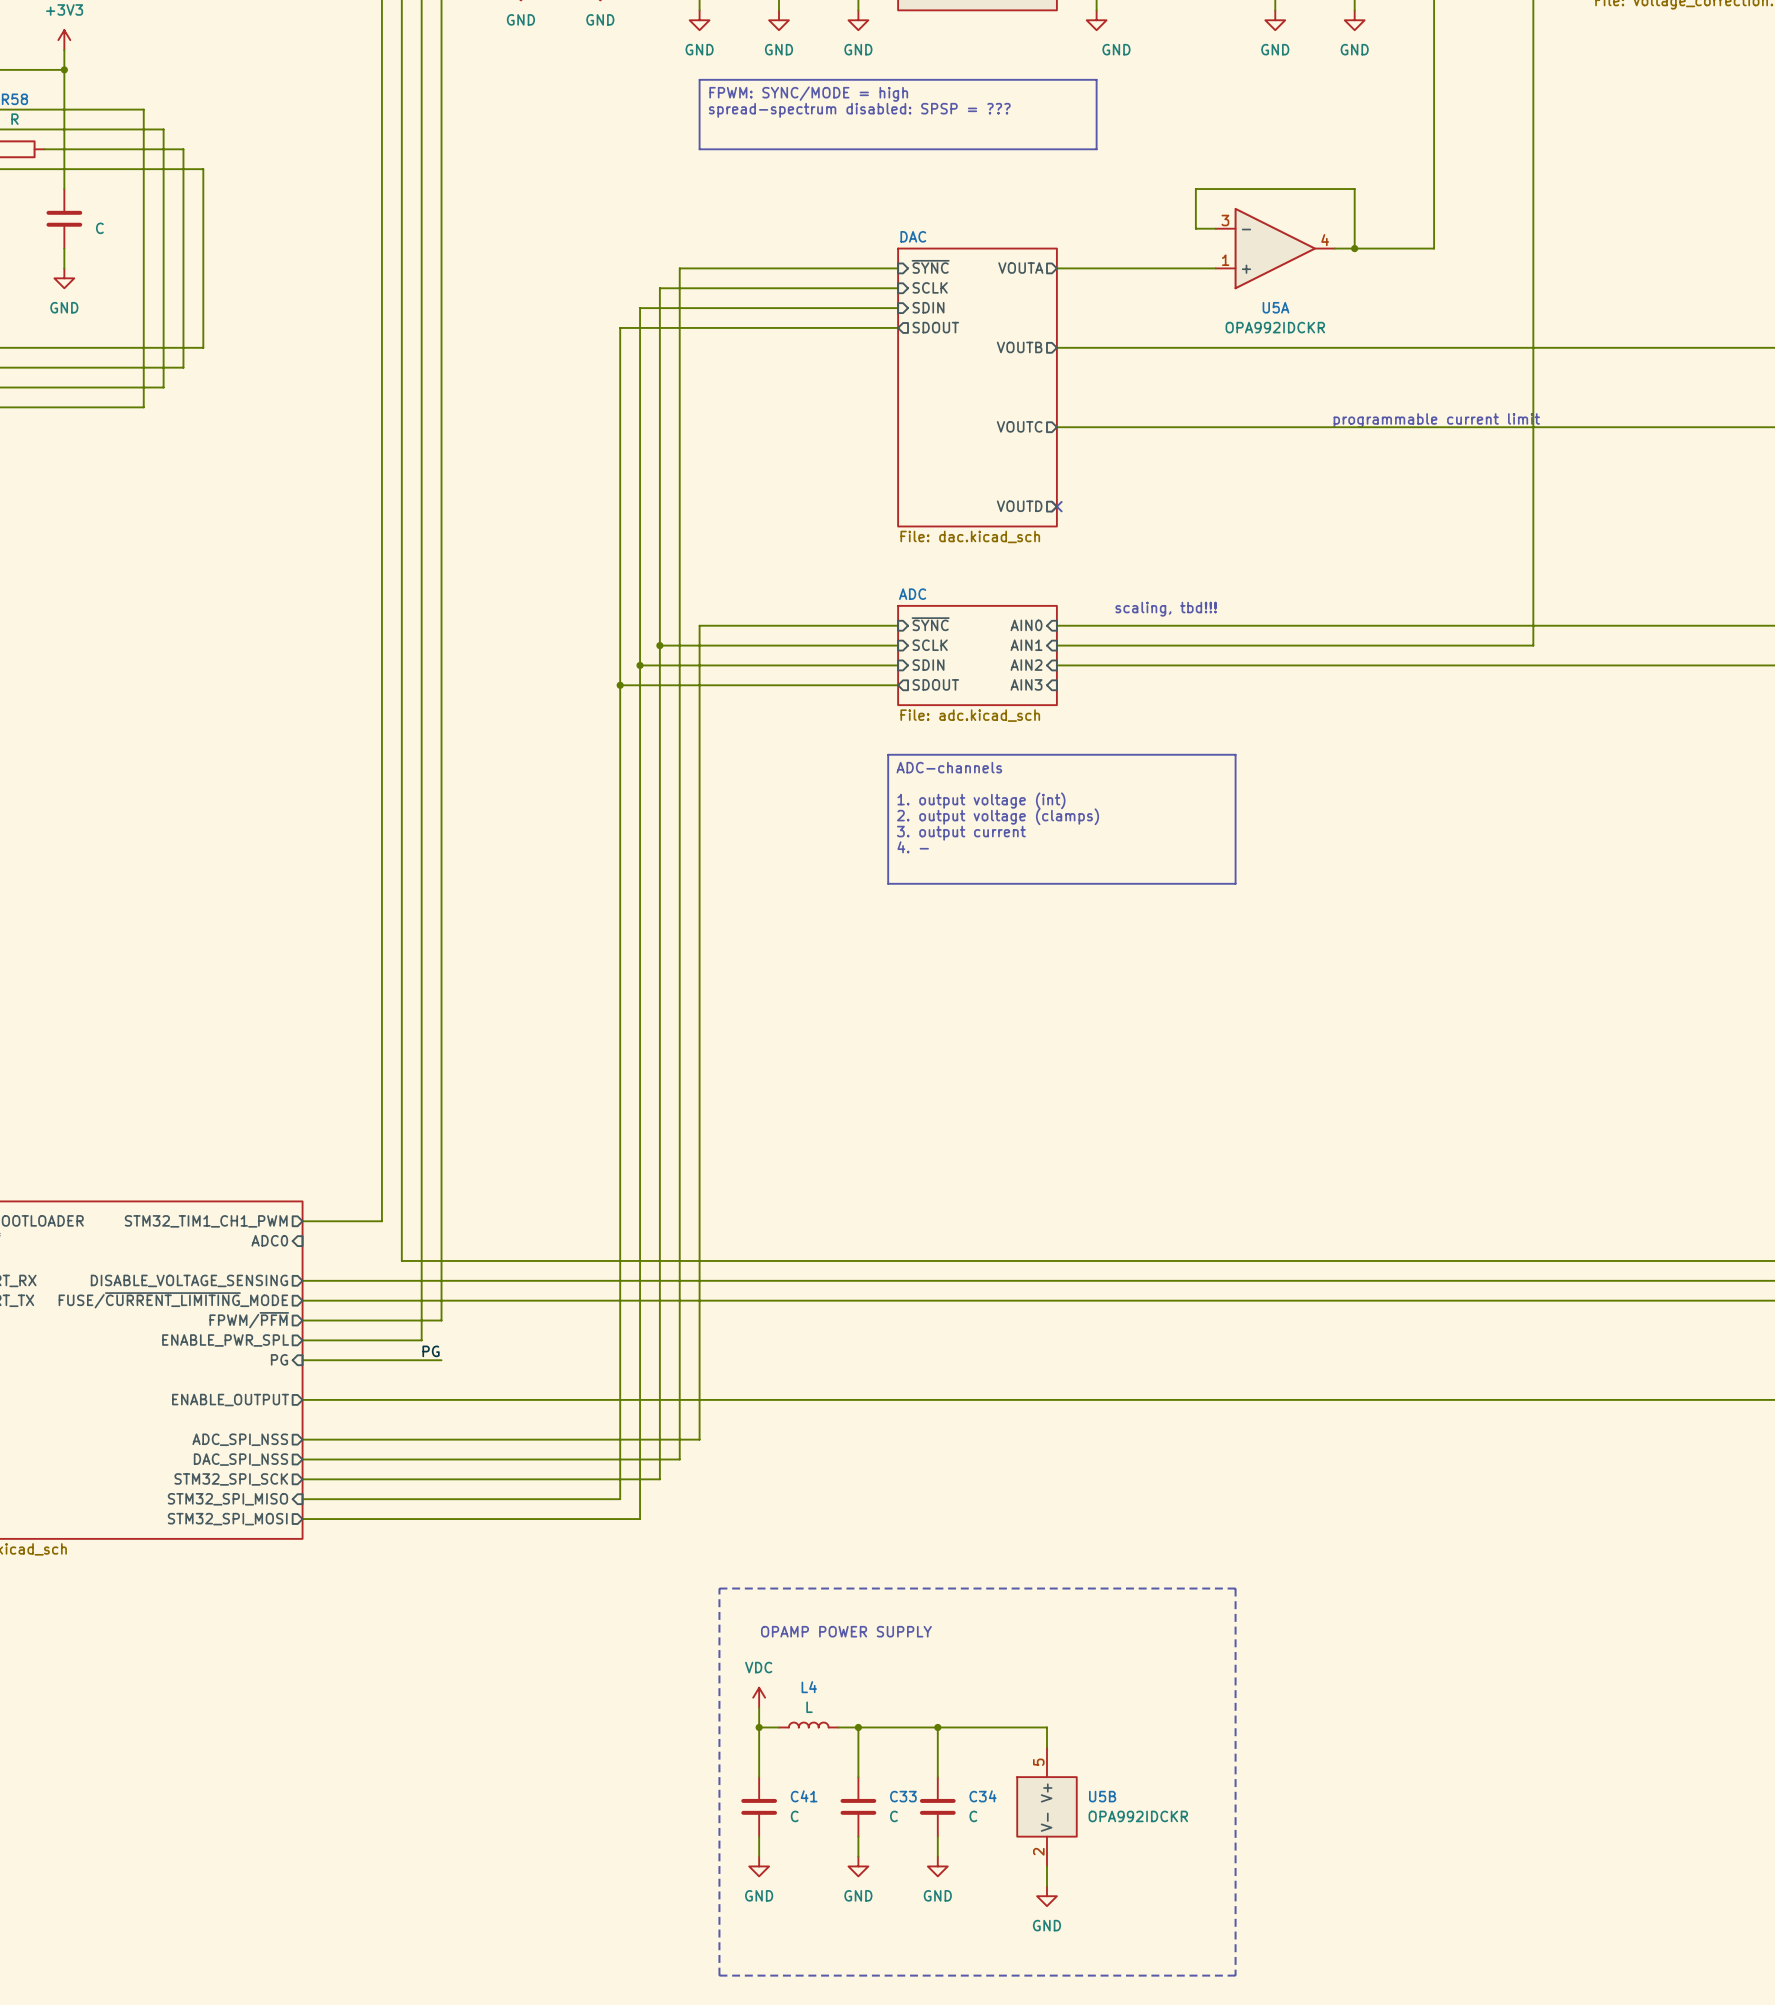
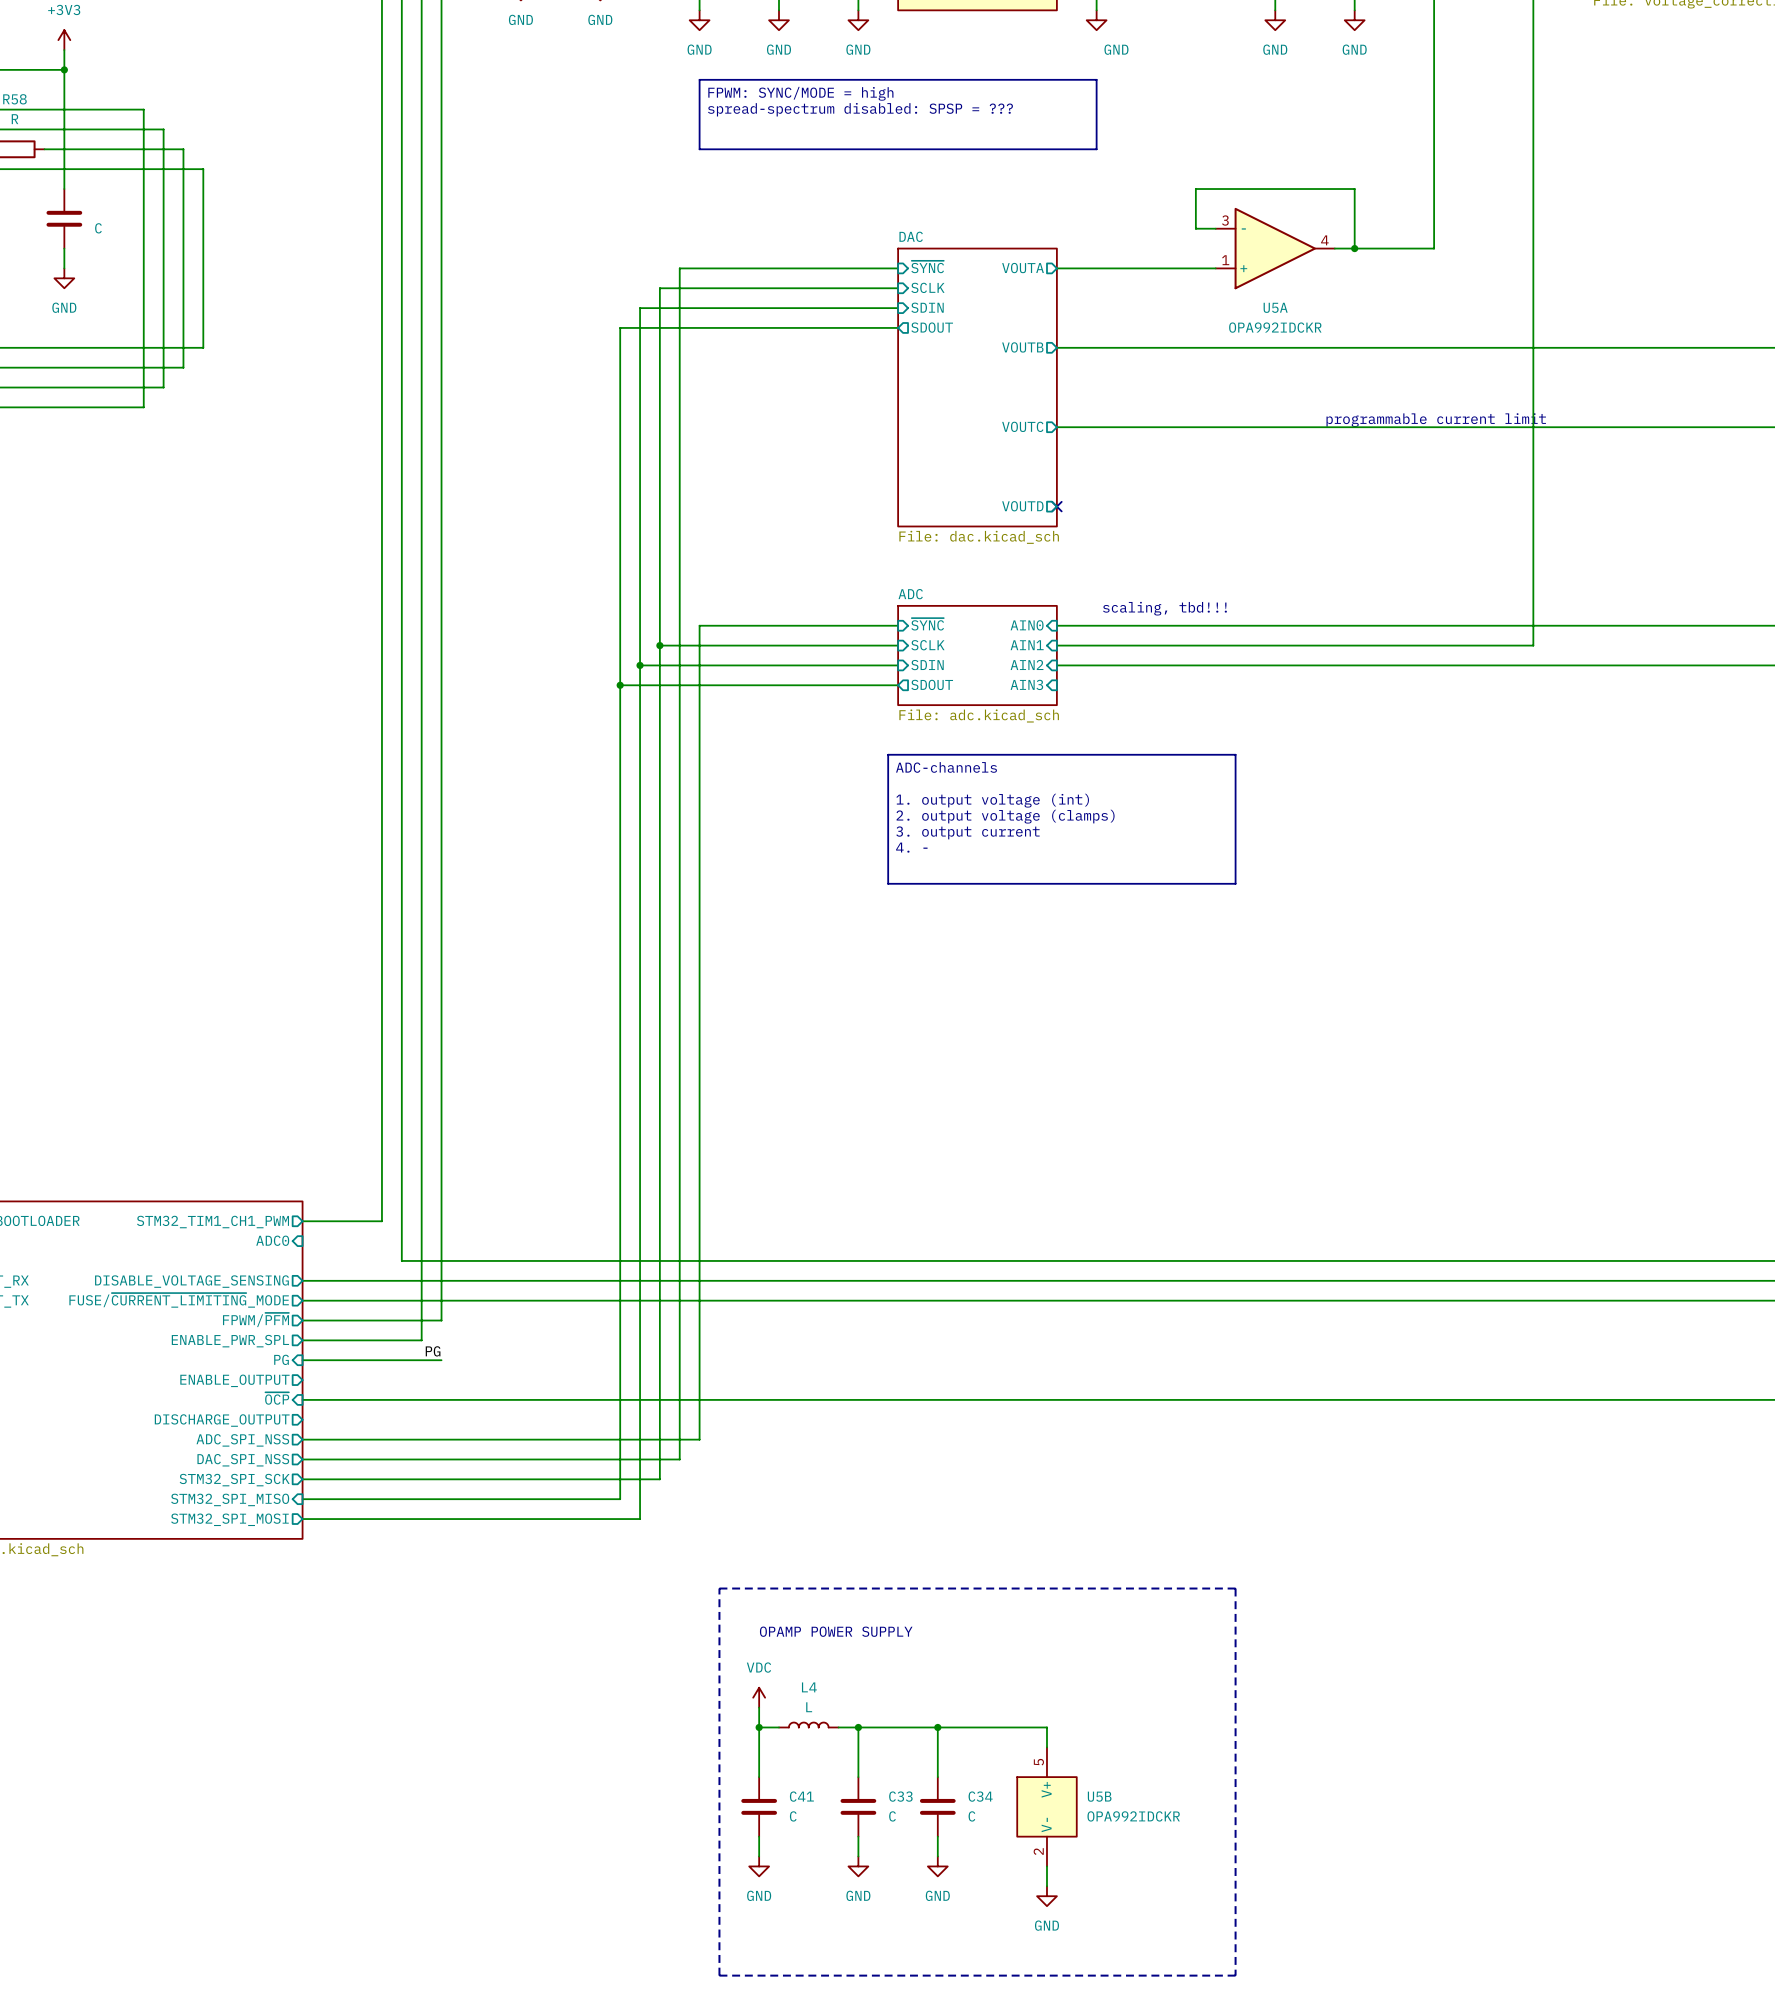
sheet pin: none -> ENABLE_OUTPUT (234, 1380)
sheet pin shape: output (230, 1400) -> input (277, 1398)
sheet pin: ENABLE_OUTPUT (230, 1400) -> ~{OCP} (277, 1398)
sheet pin: none -> DISCHARGE_OUTPUT (222, 1420)

